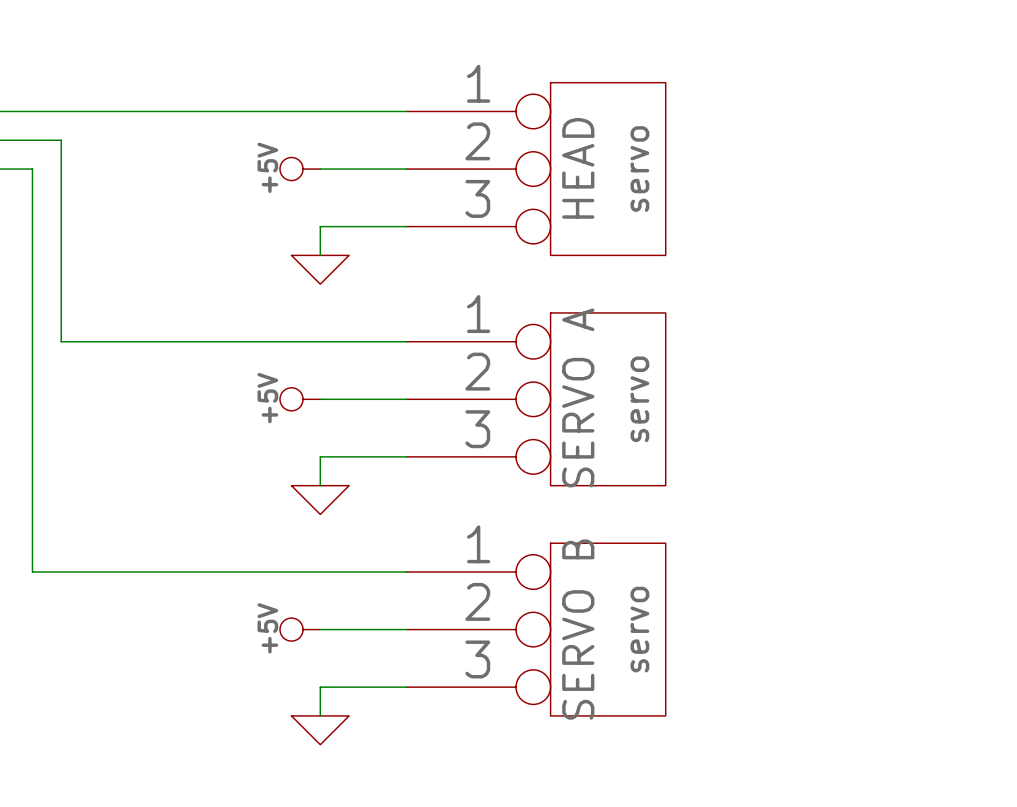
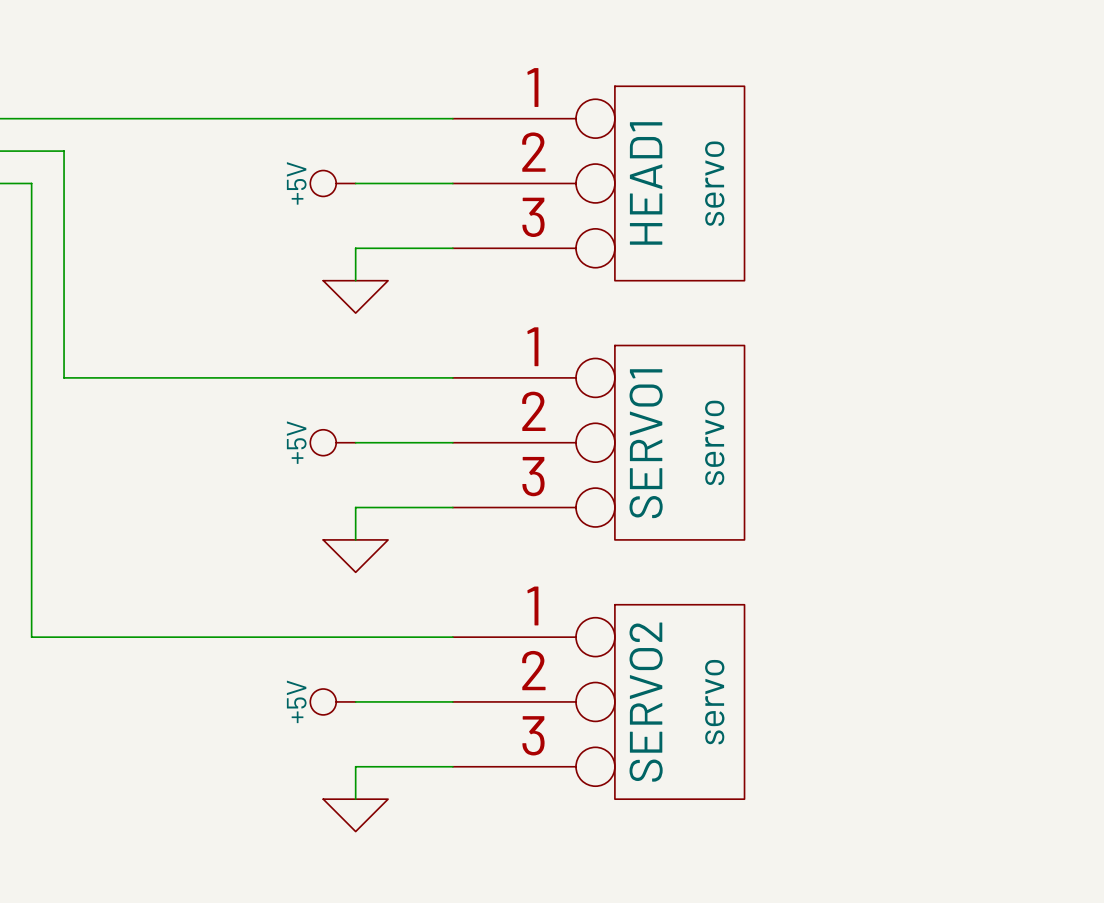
HEAD name: HEAD (578, 168) -> HEAD1 (646, 183)
SERVO A name: SERVO A (578, 397) -> SERVO1 (646, 443)
SERVO B name: SERVO B (578, 629) -> SERVO2 (646, 702)

